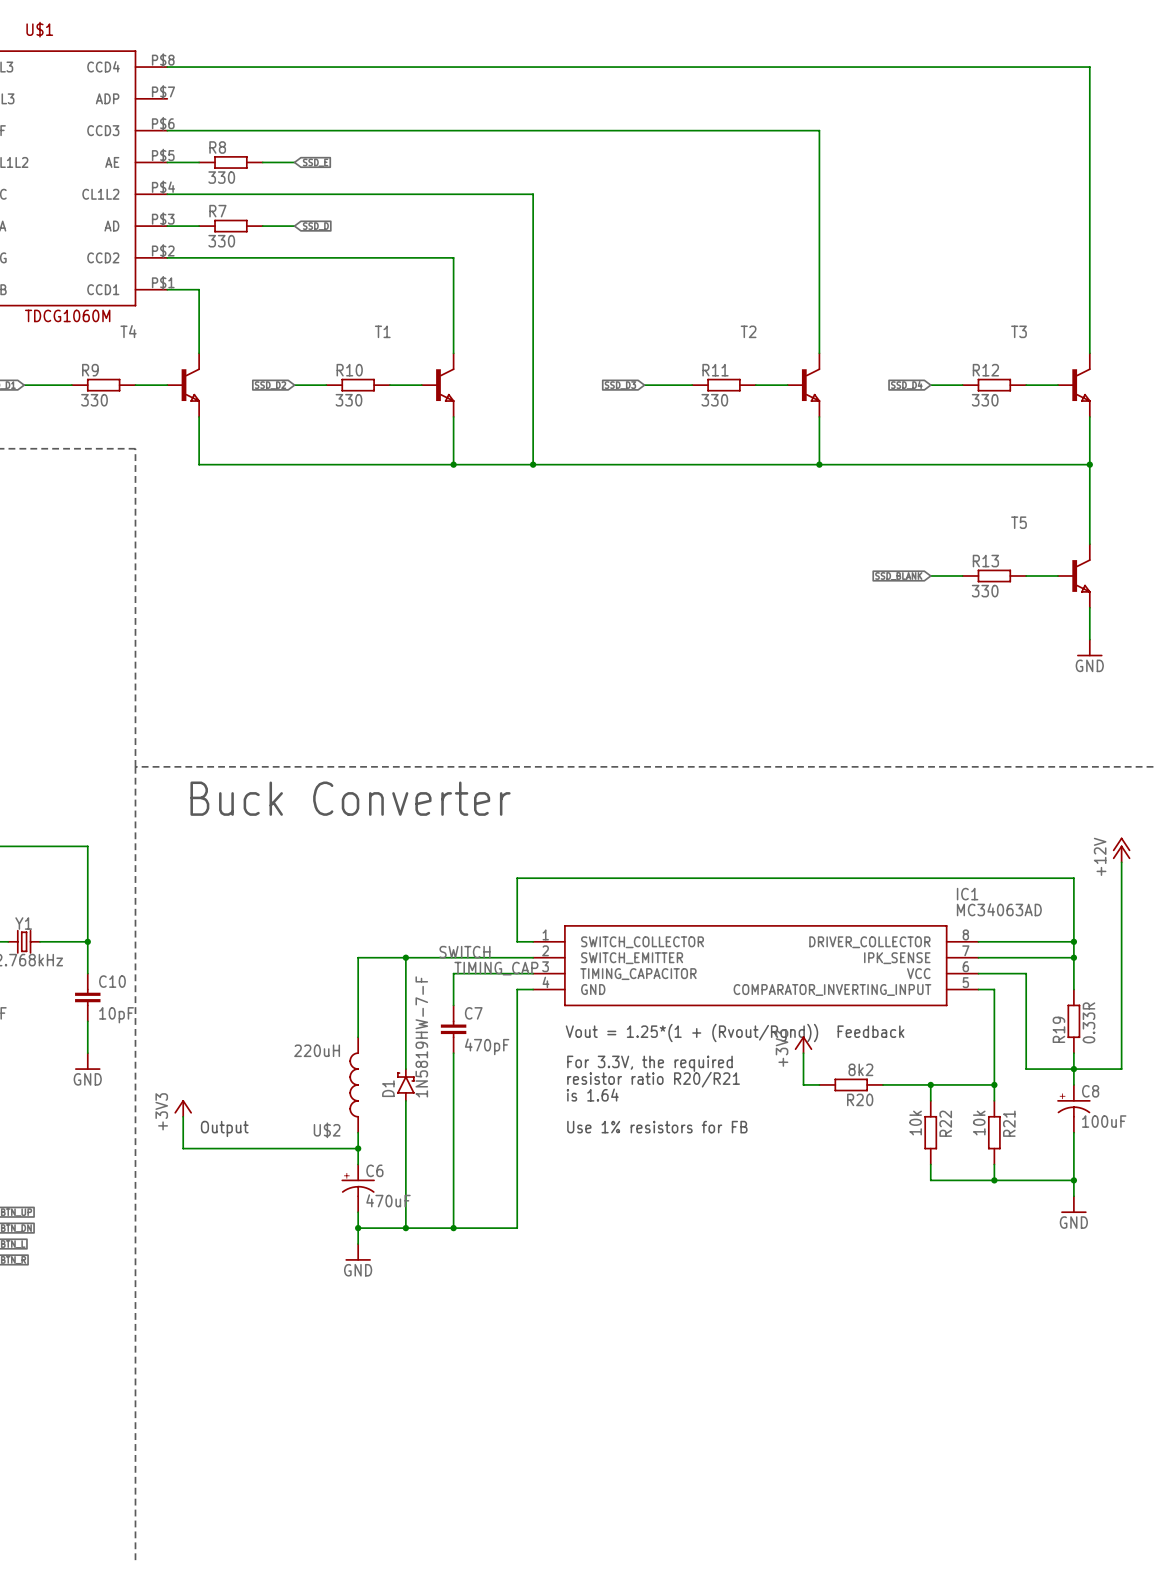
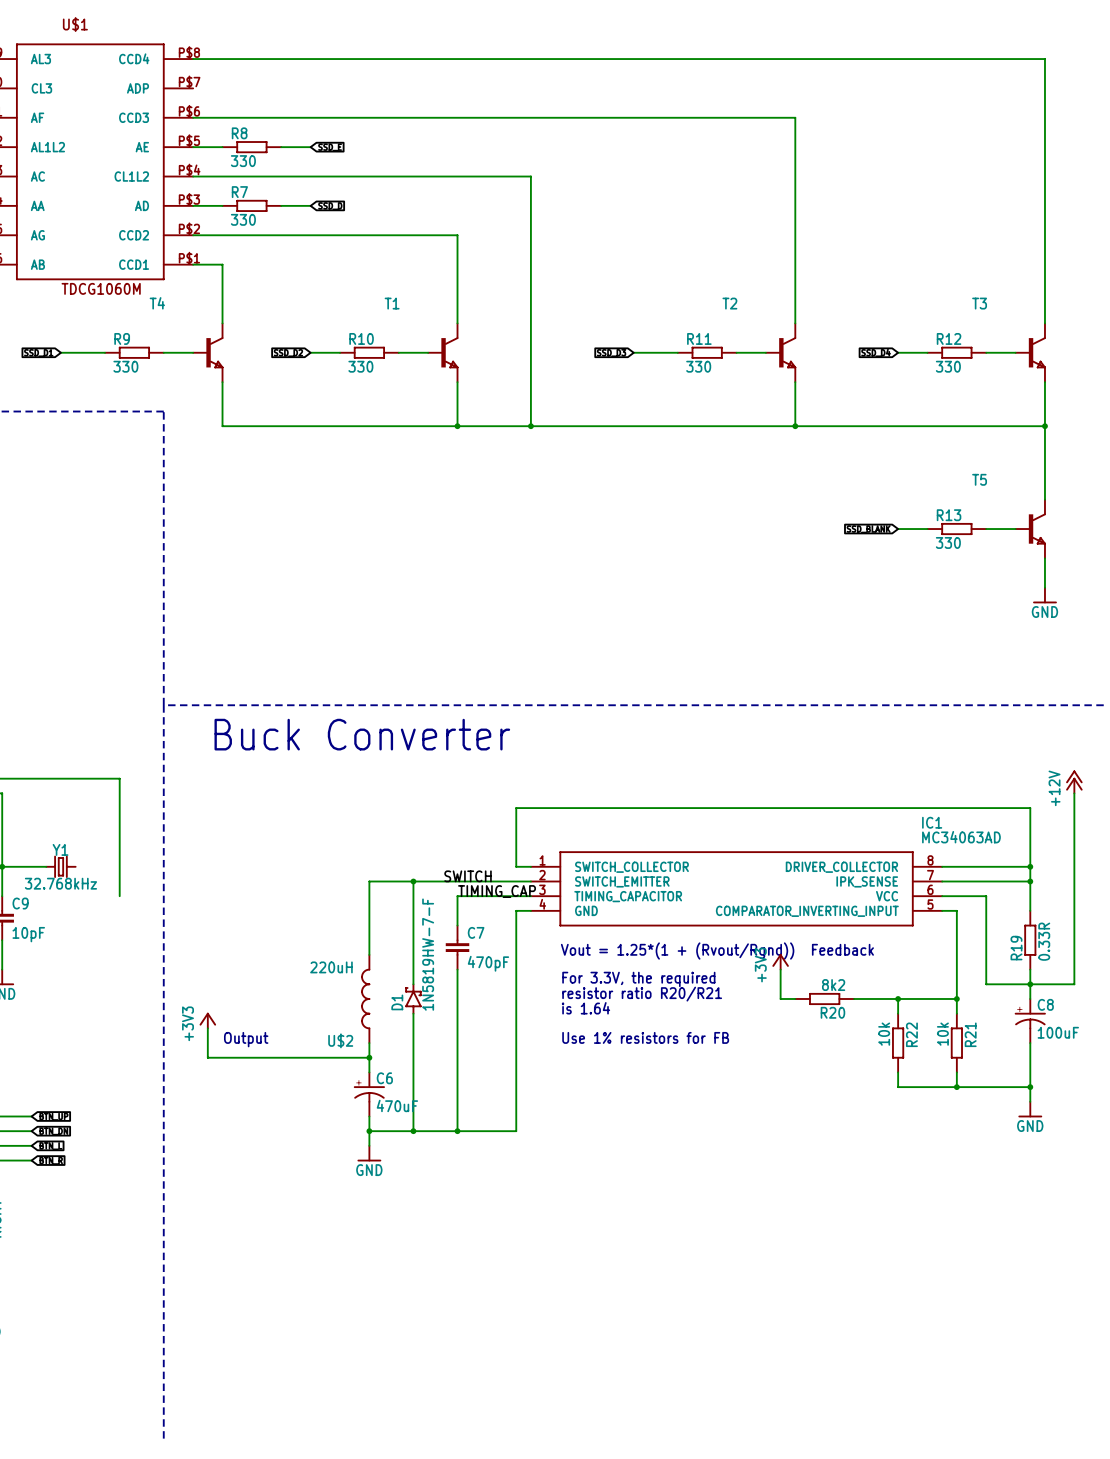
wire: (40, 941) (87, 941) -> none
junction: (87, 941) -> none
C10: 10pF (87, 997) -> none
wire: (87, 1021) (87, 1053) -> none
power symbol: GND (87, 1061) -> none

